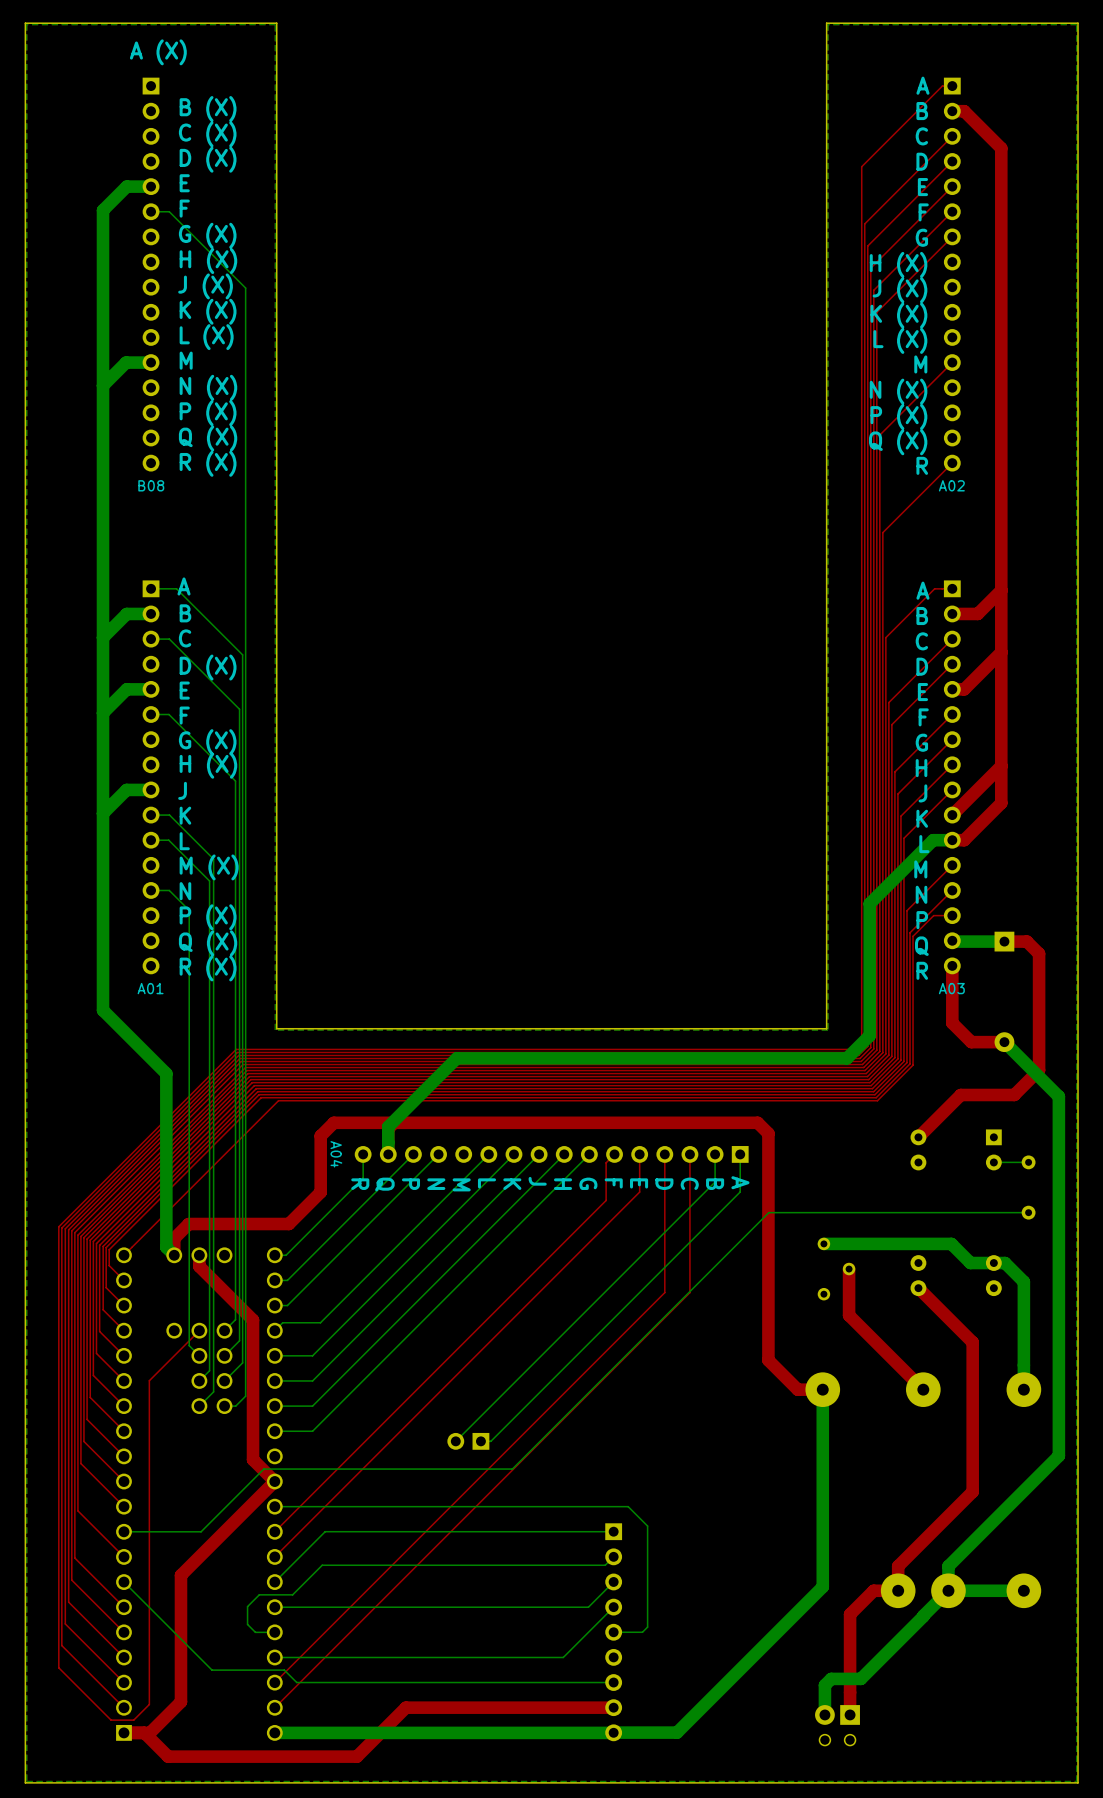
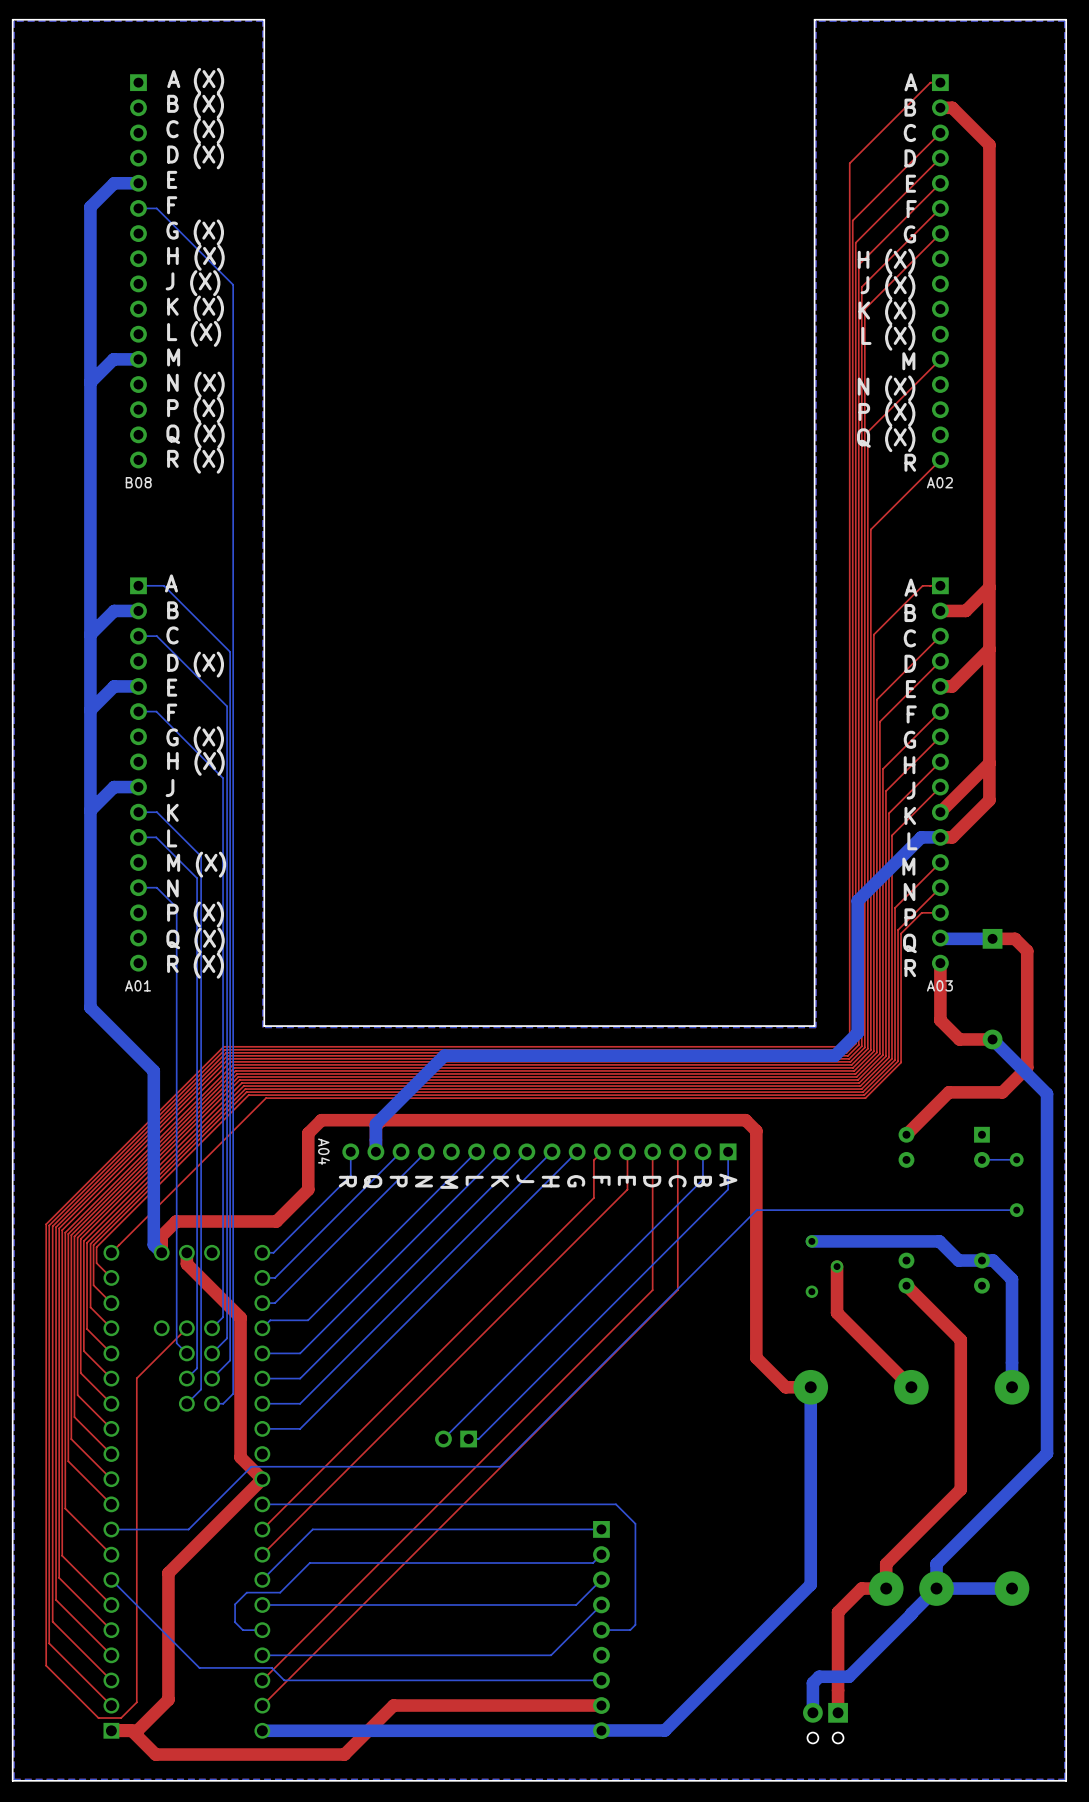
text position: A (X) (158, 52) -> A (X) (195, 80)

